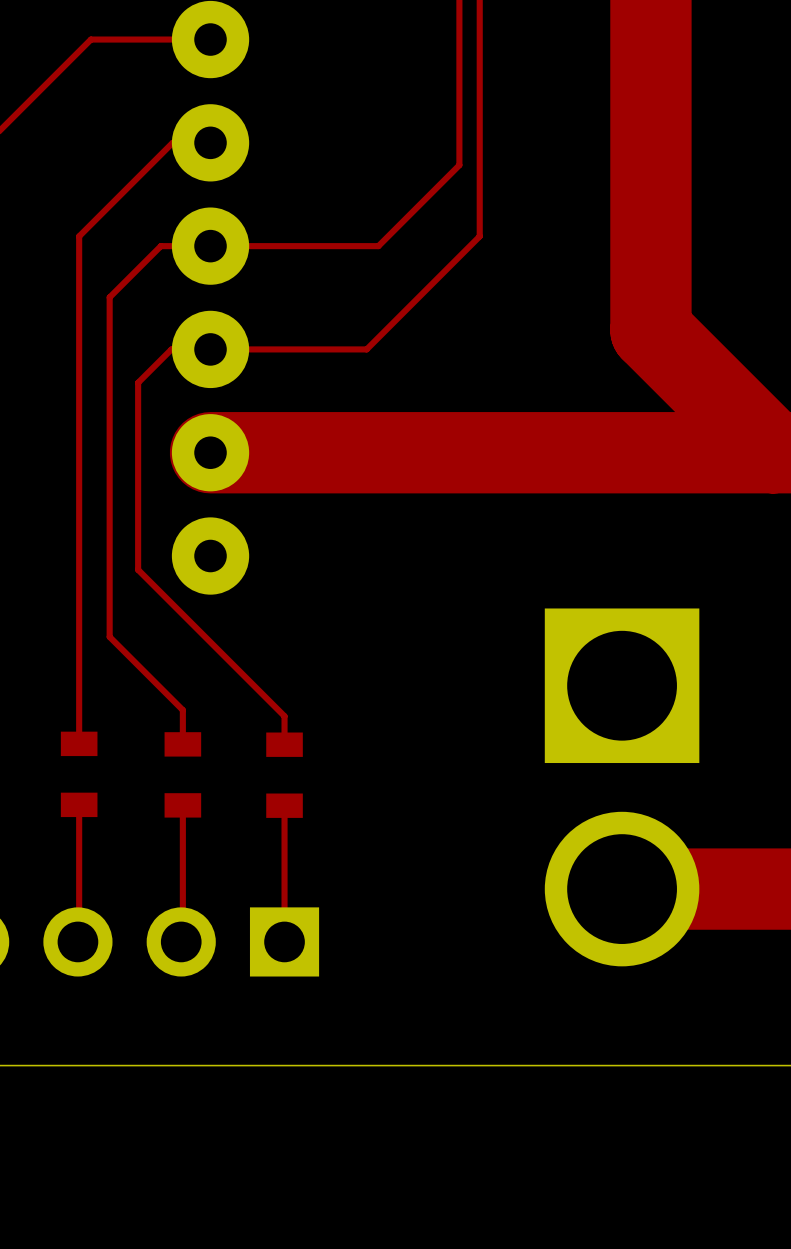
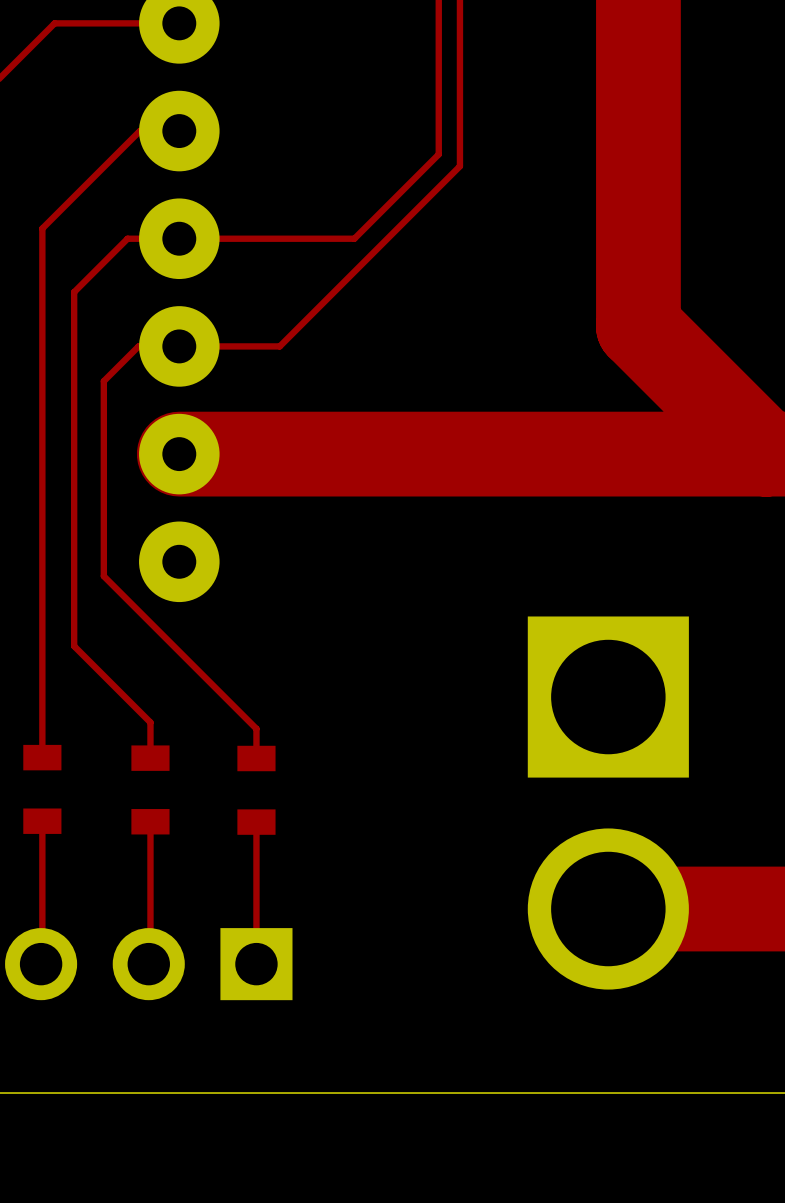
top track: (479, 176) (479, 236) (366, 349) (306, 349) -> (459, 166) (279, 346)

